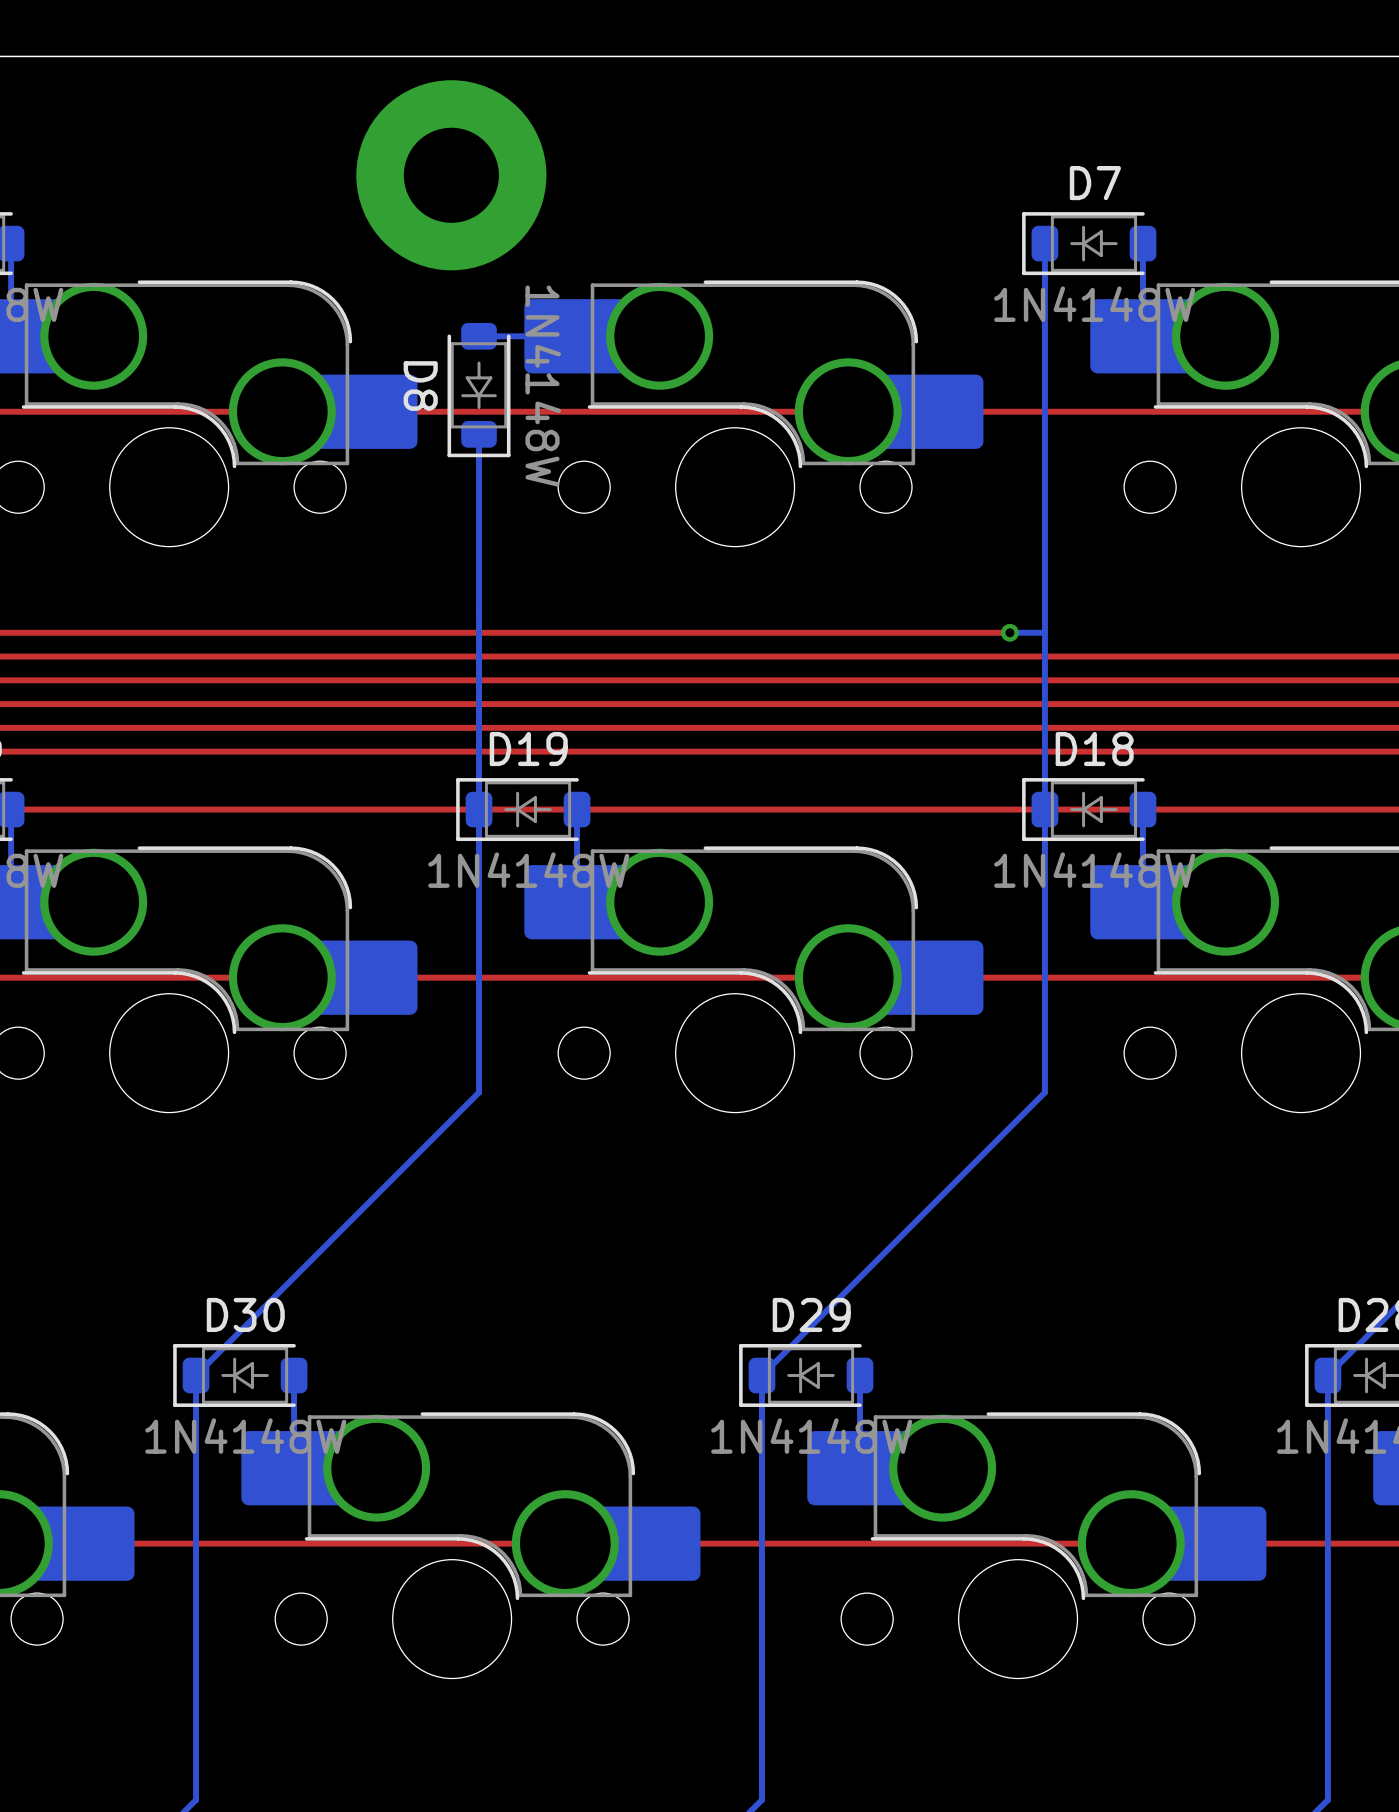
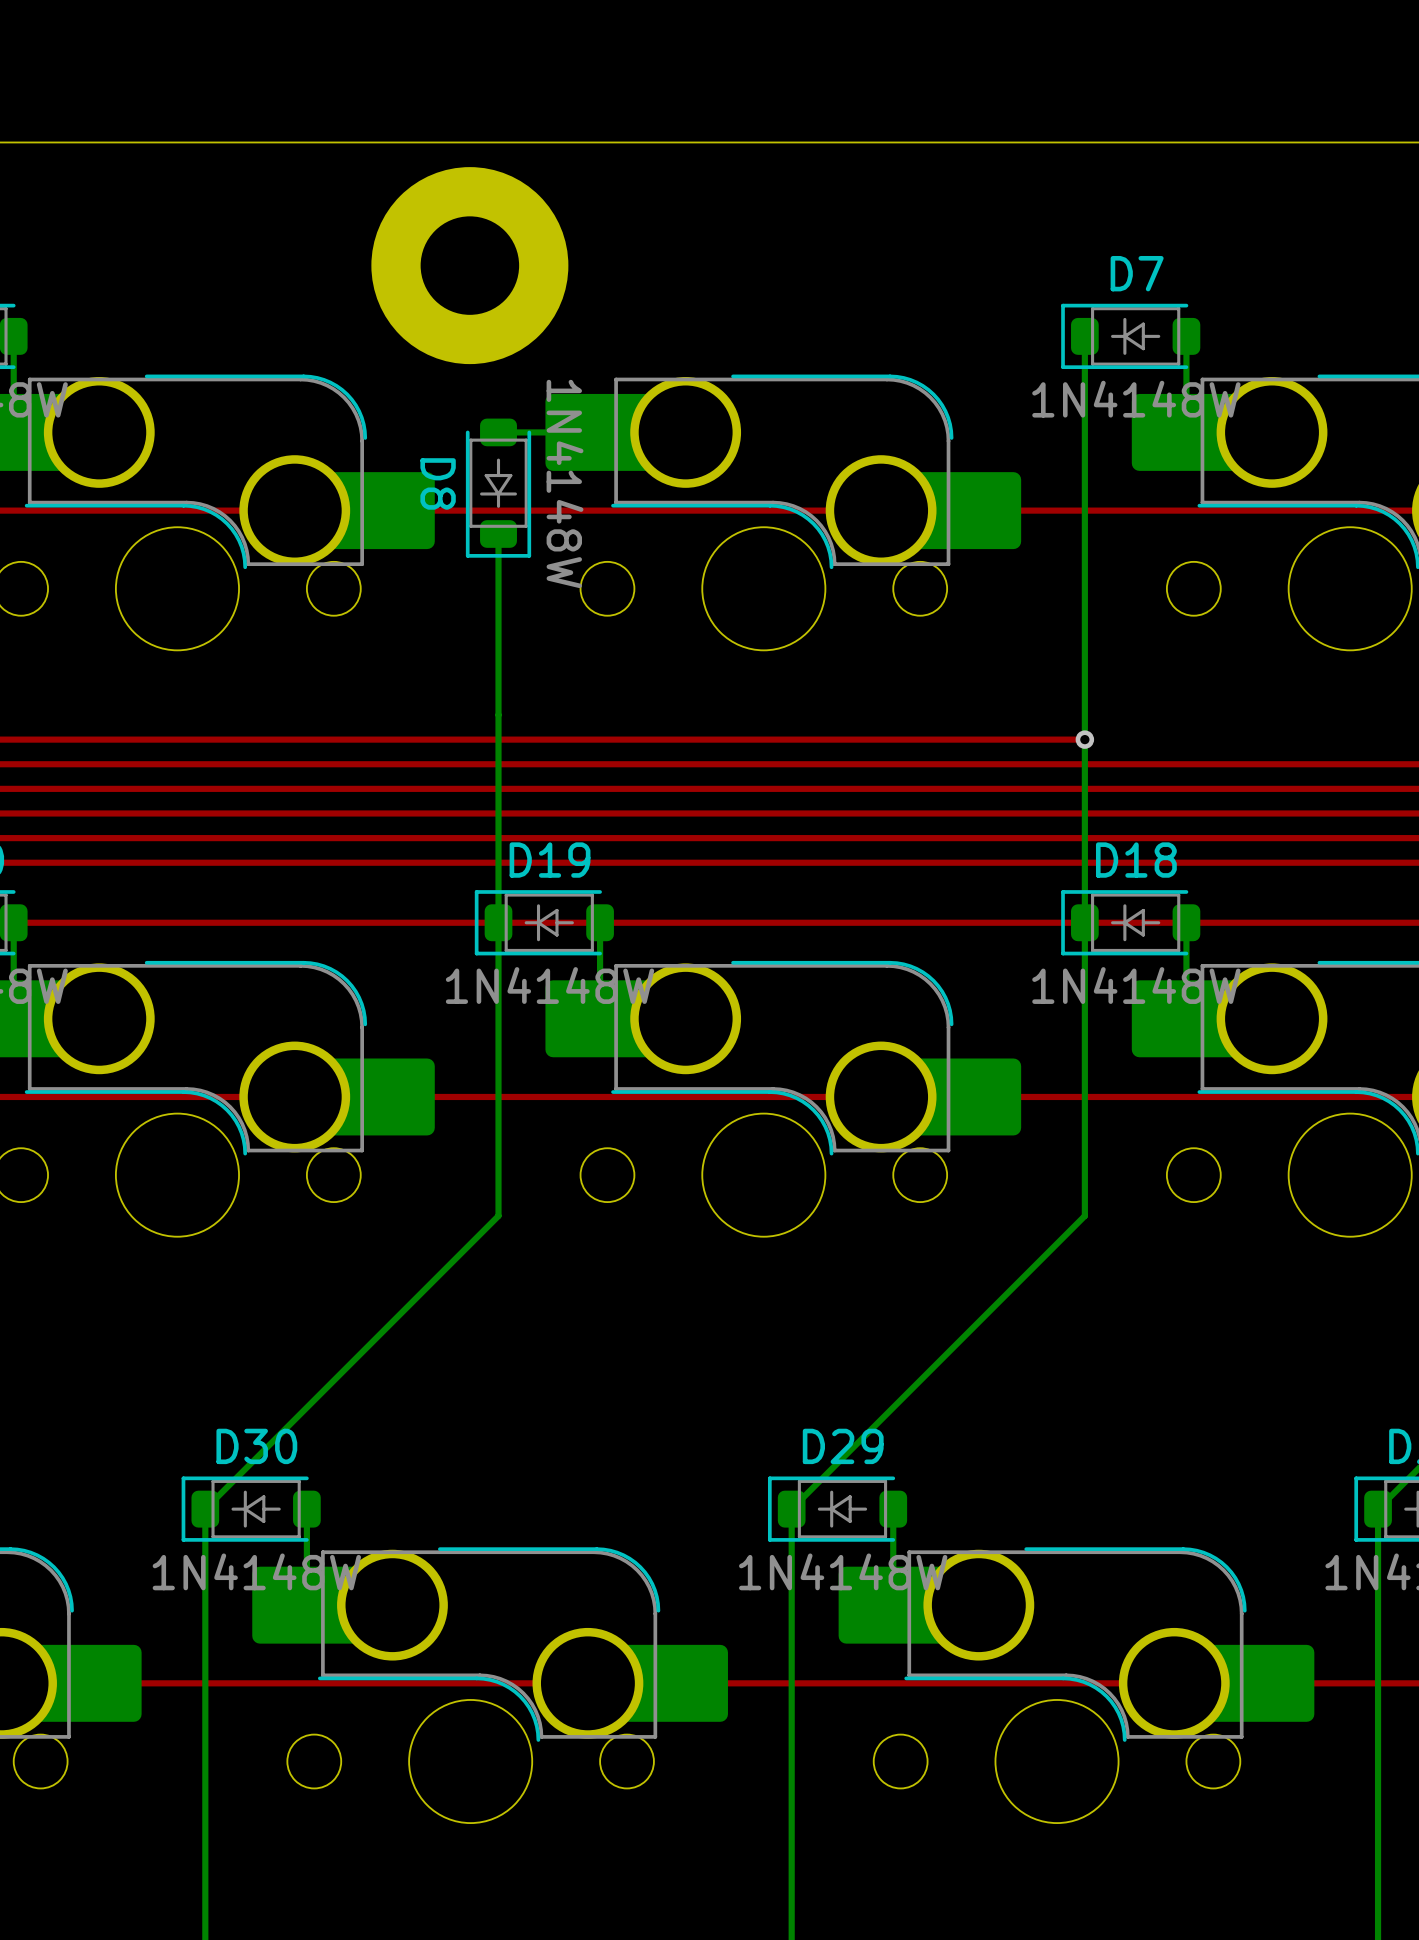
via position: (1009, 632) -> (1084, 739)
top track: none -> (1084, 739) (1048, 739)
bottom track: (1044, 632) (1009, 632) -> none

